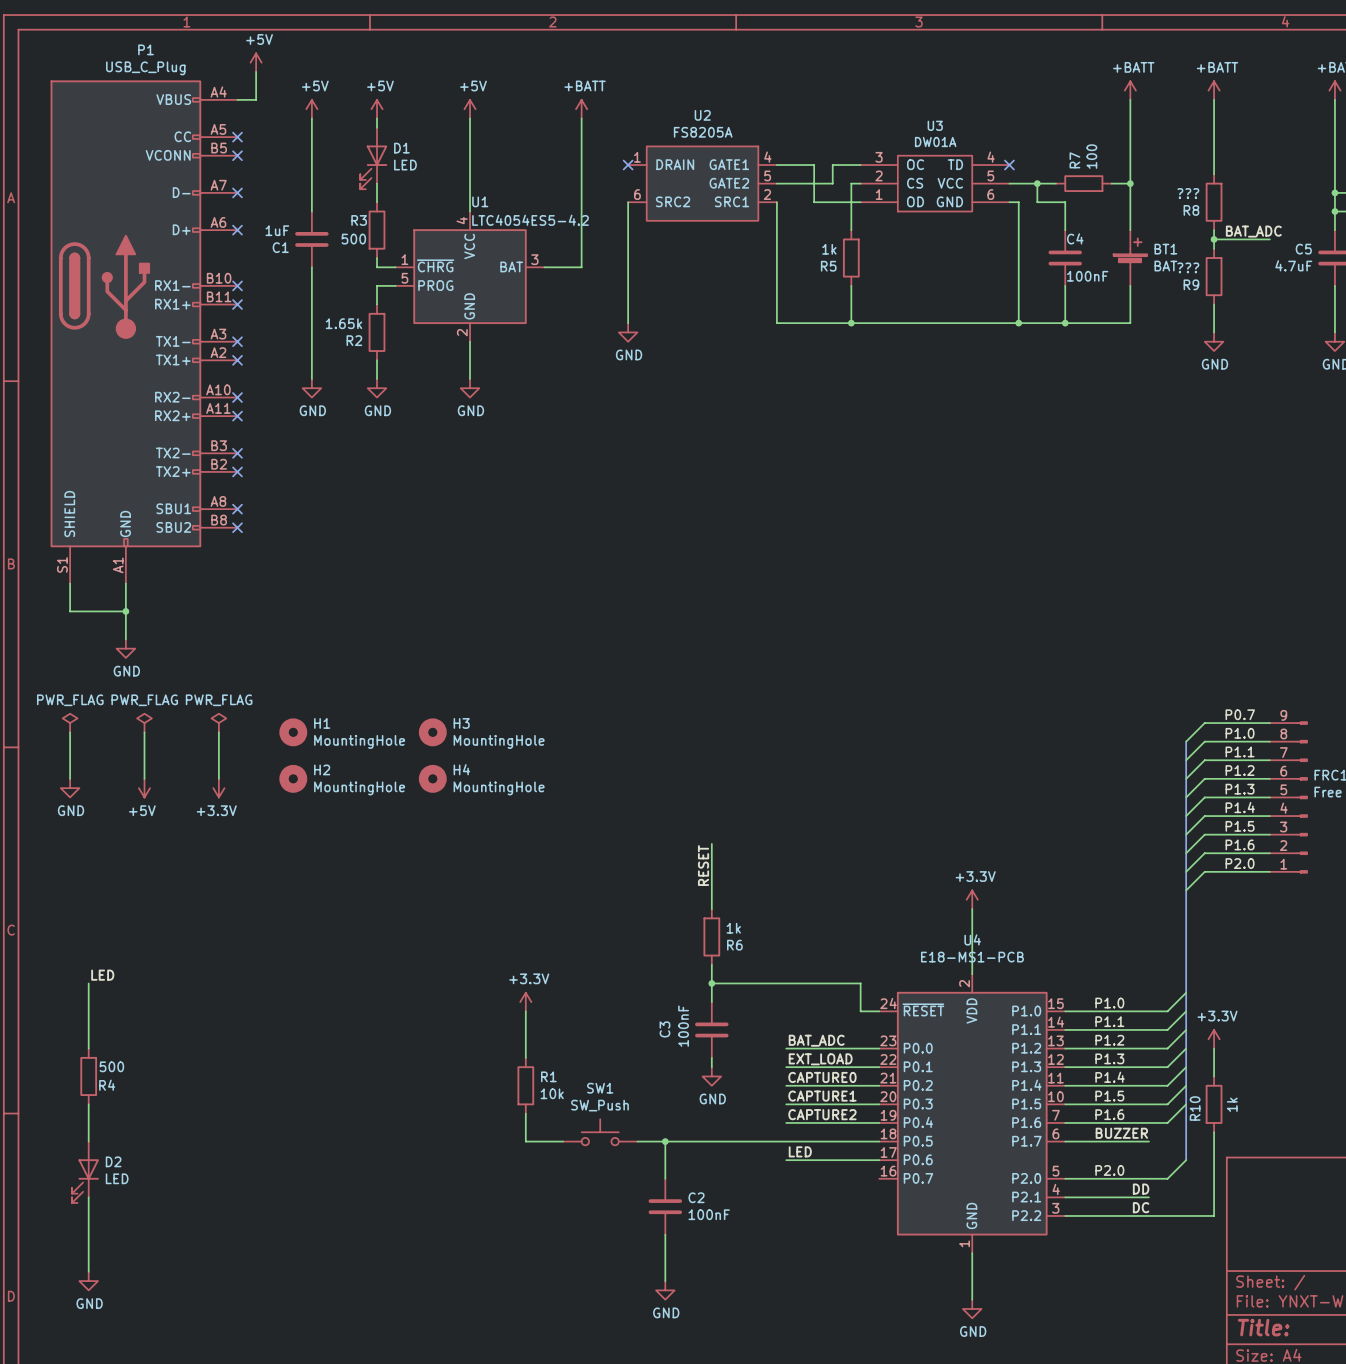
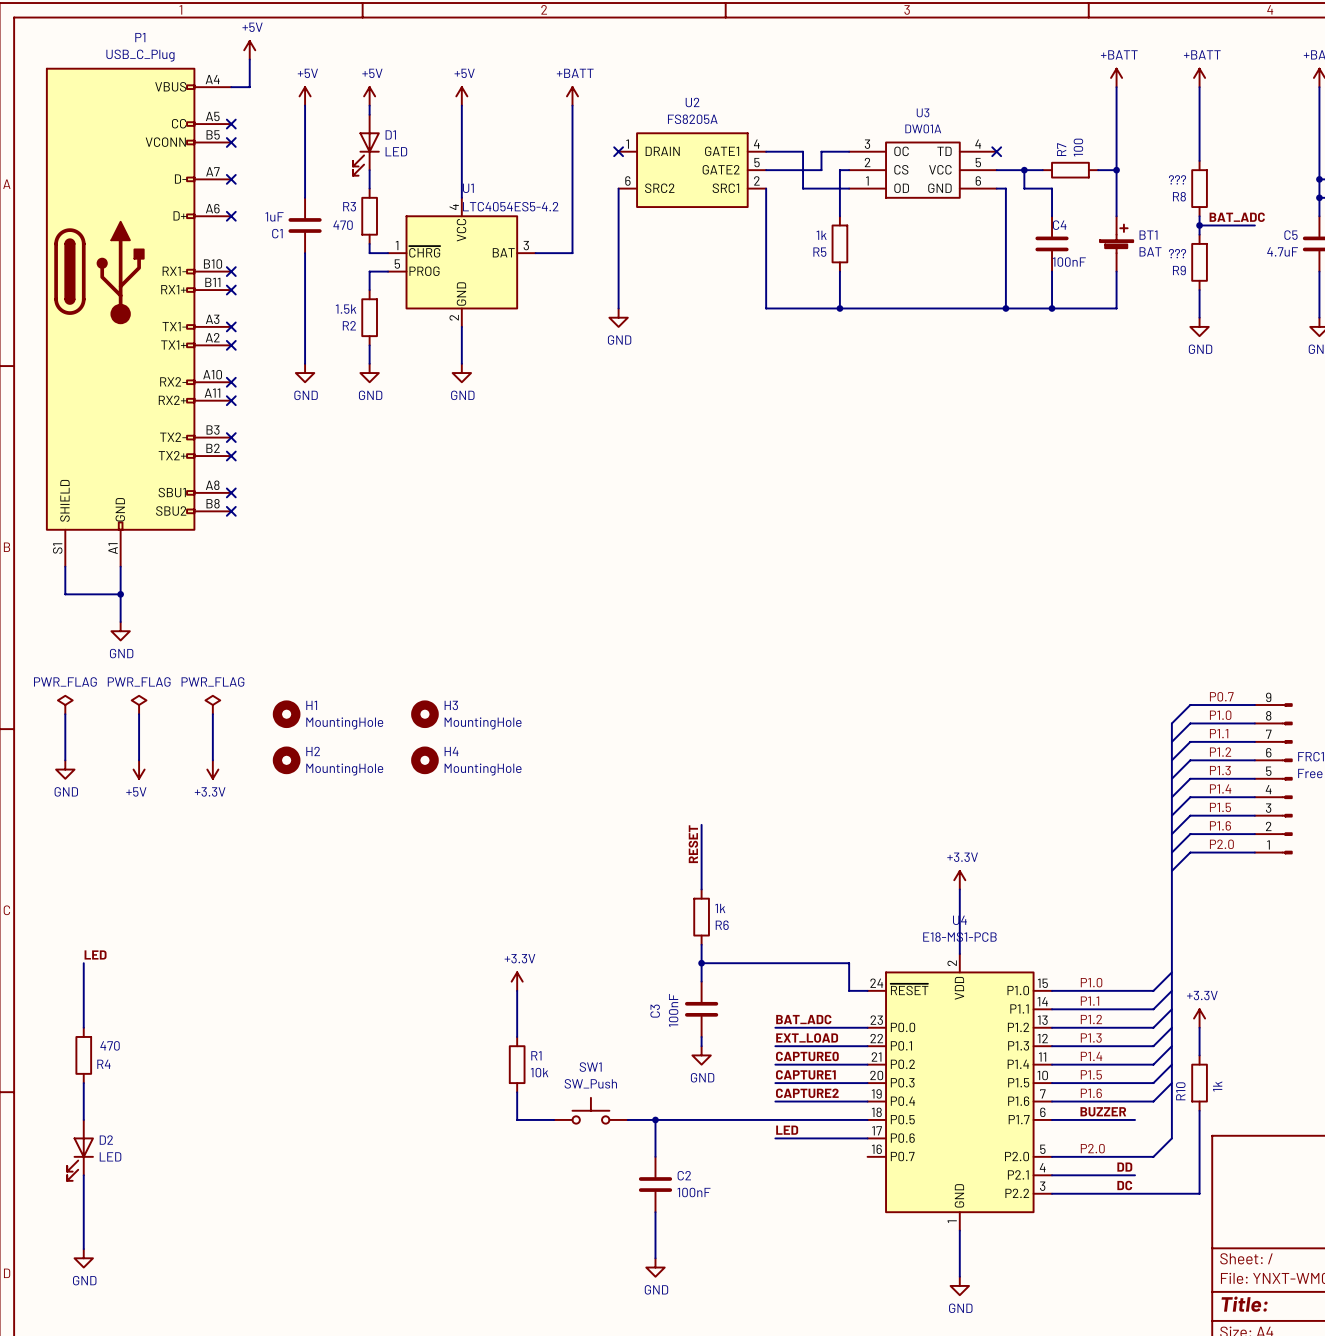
R3 value: 500 (353, 239) -> 470 (343, 225)
R2 value: 1.65k (343, 323) -> 1.5k (346, 309)
R4 value: 500 (111, 1066) -> 470 (110, 1045)

